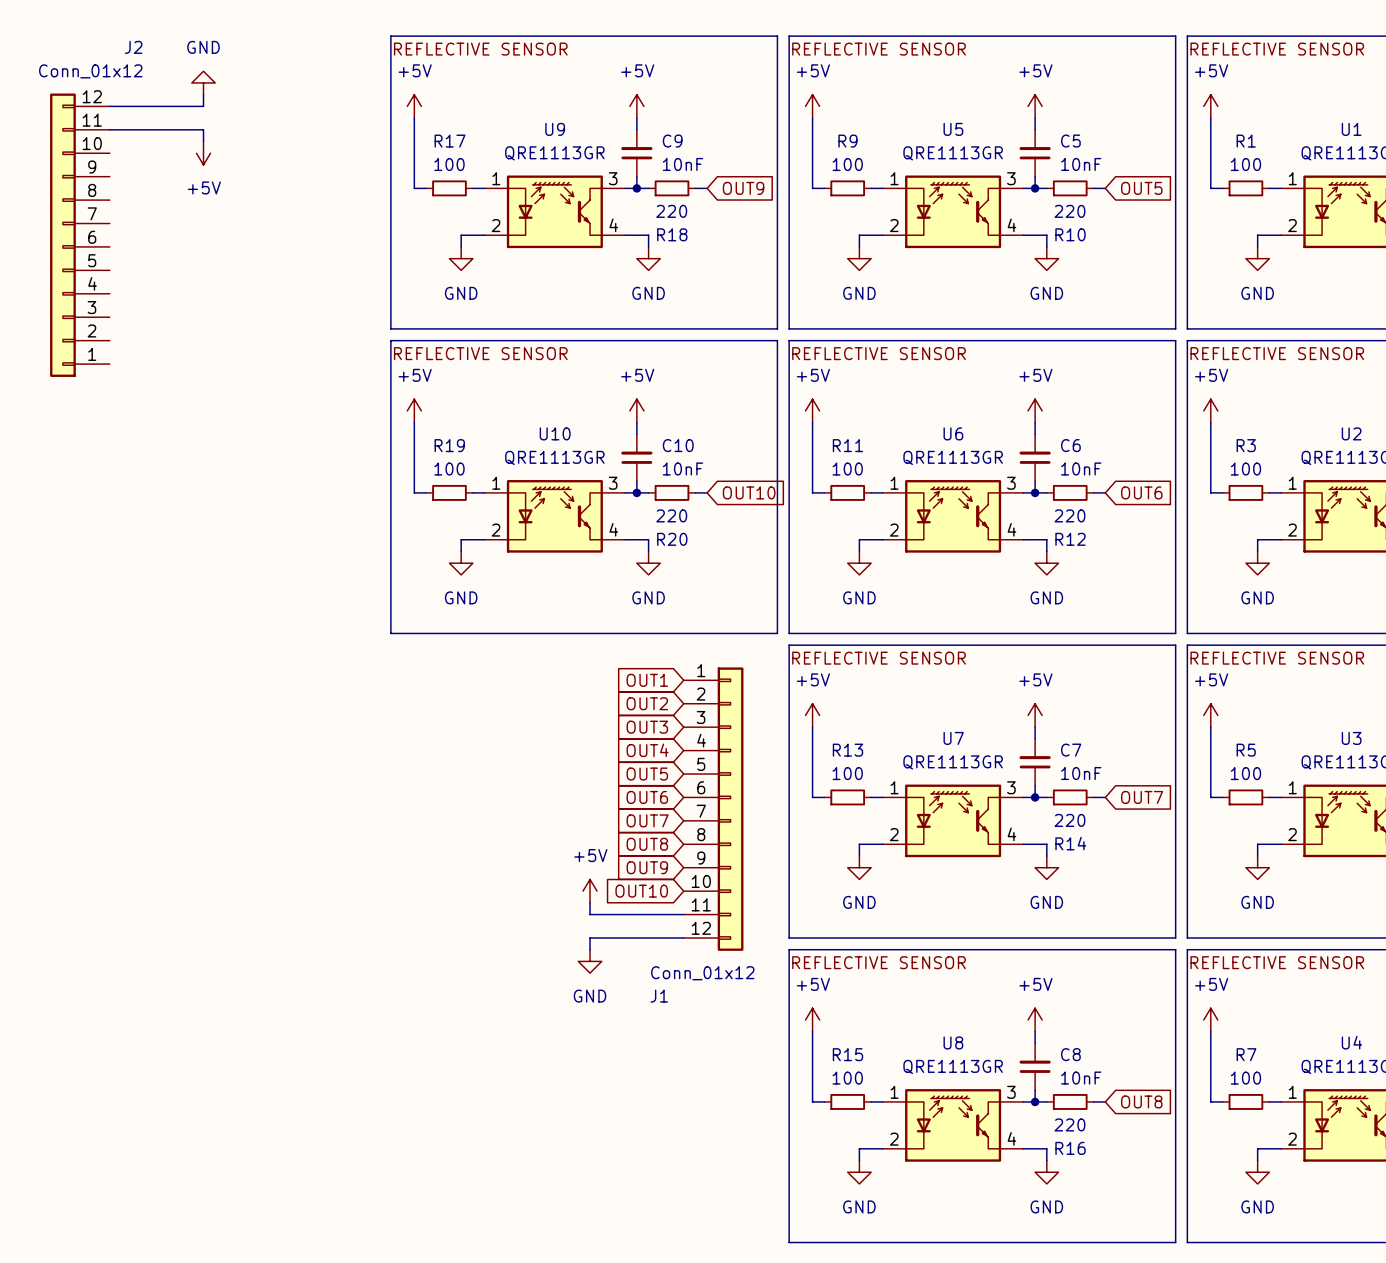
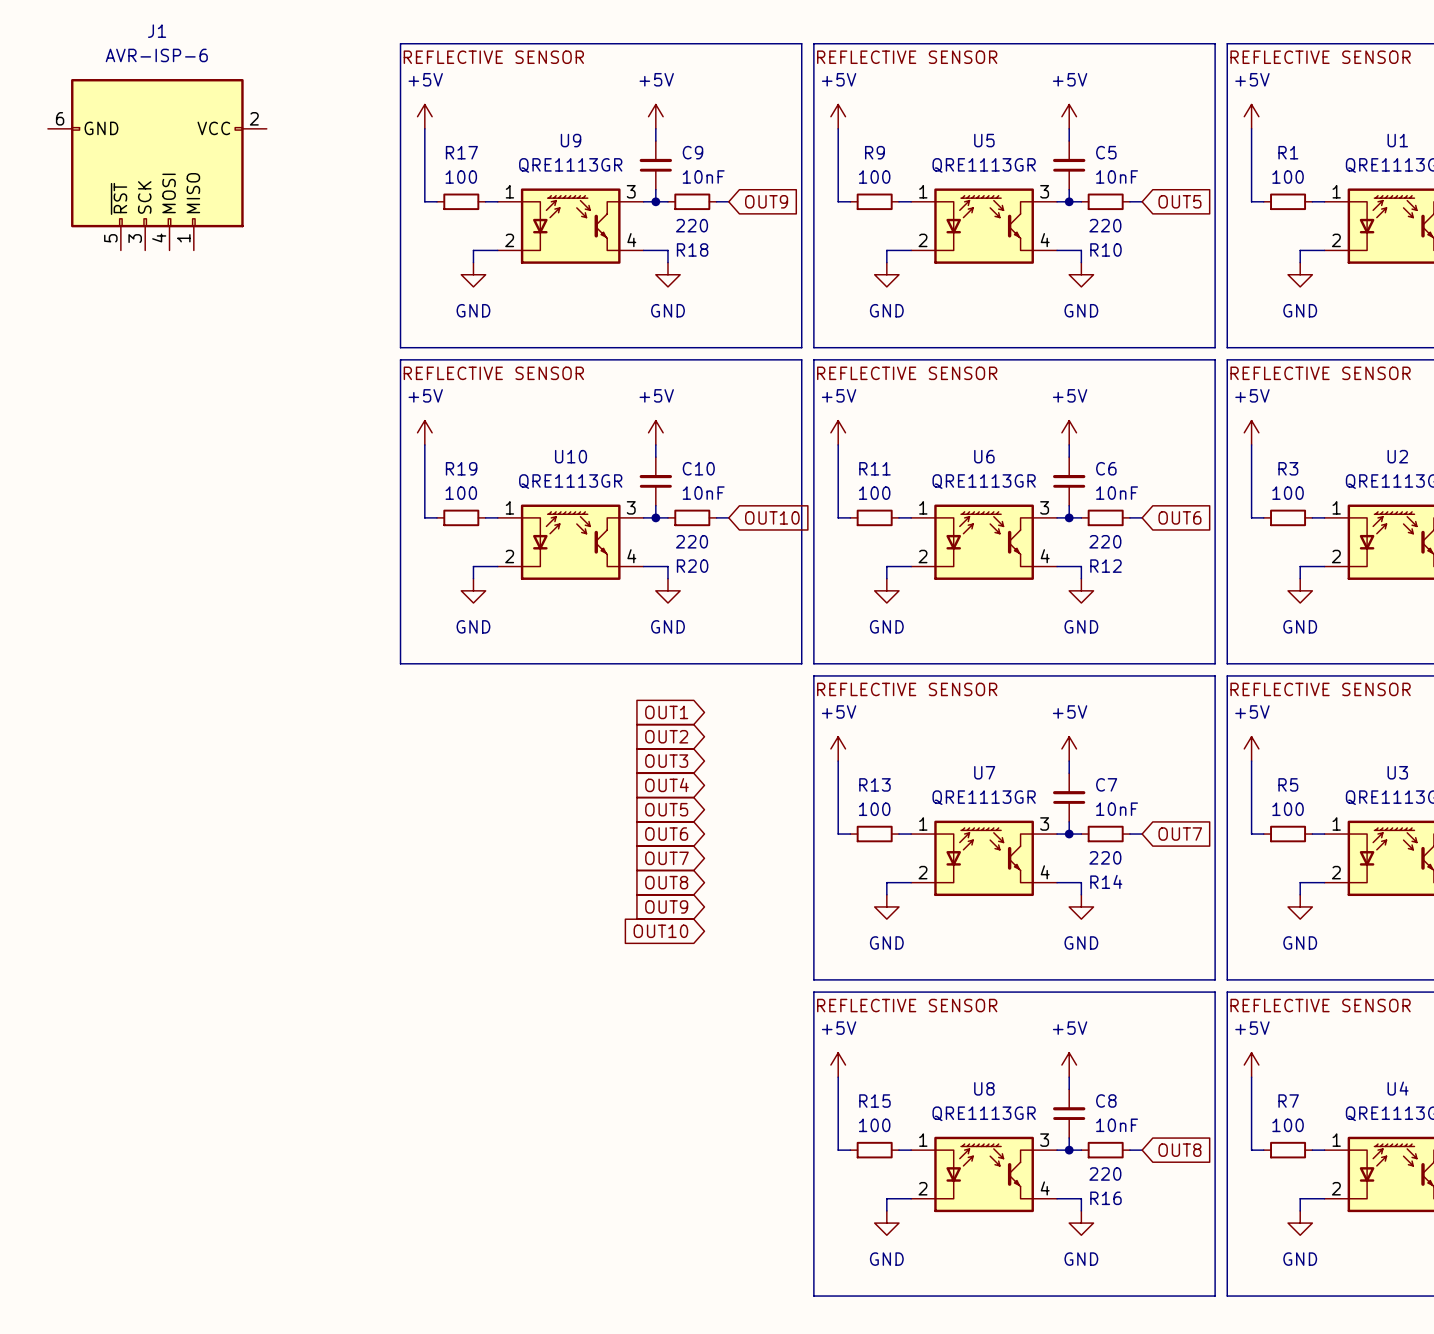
power symbol: GND (203, 82) -> none
power symbol: +5V (203, 153) -> none
J2: Conn_01x12 (79, 235) -> none
J1 symbol: [683, 667, 744, 951] -> [47, 79, 267, 251]
power symbol: +5V (590, 891) -> none
wire: (590, 902) (590, 914) (683, 914) -> none
wire: (683, 937) (590, 937) (590, 949) -> none
power symbol: GND (590, 961) -> none
J1 value: Conn_01x12 (702, 973) -> AVR-ISP-6 (156, 55)
J1 name position: J1 (659, 996) -> J1 (157, 31)

